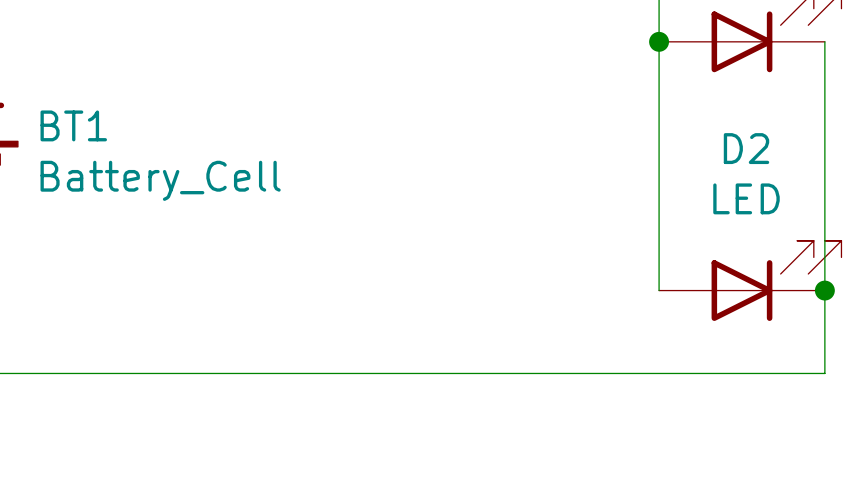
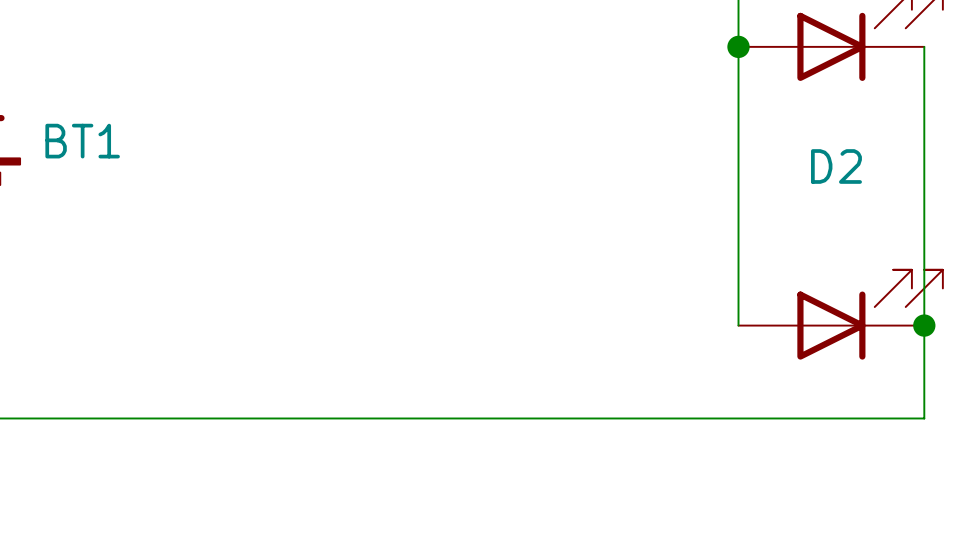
BT1 value: Battery_Cell (160, 180) -> none
D2 value: LED (746, 198) -> none

